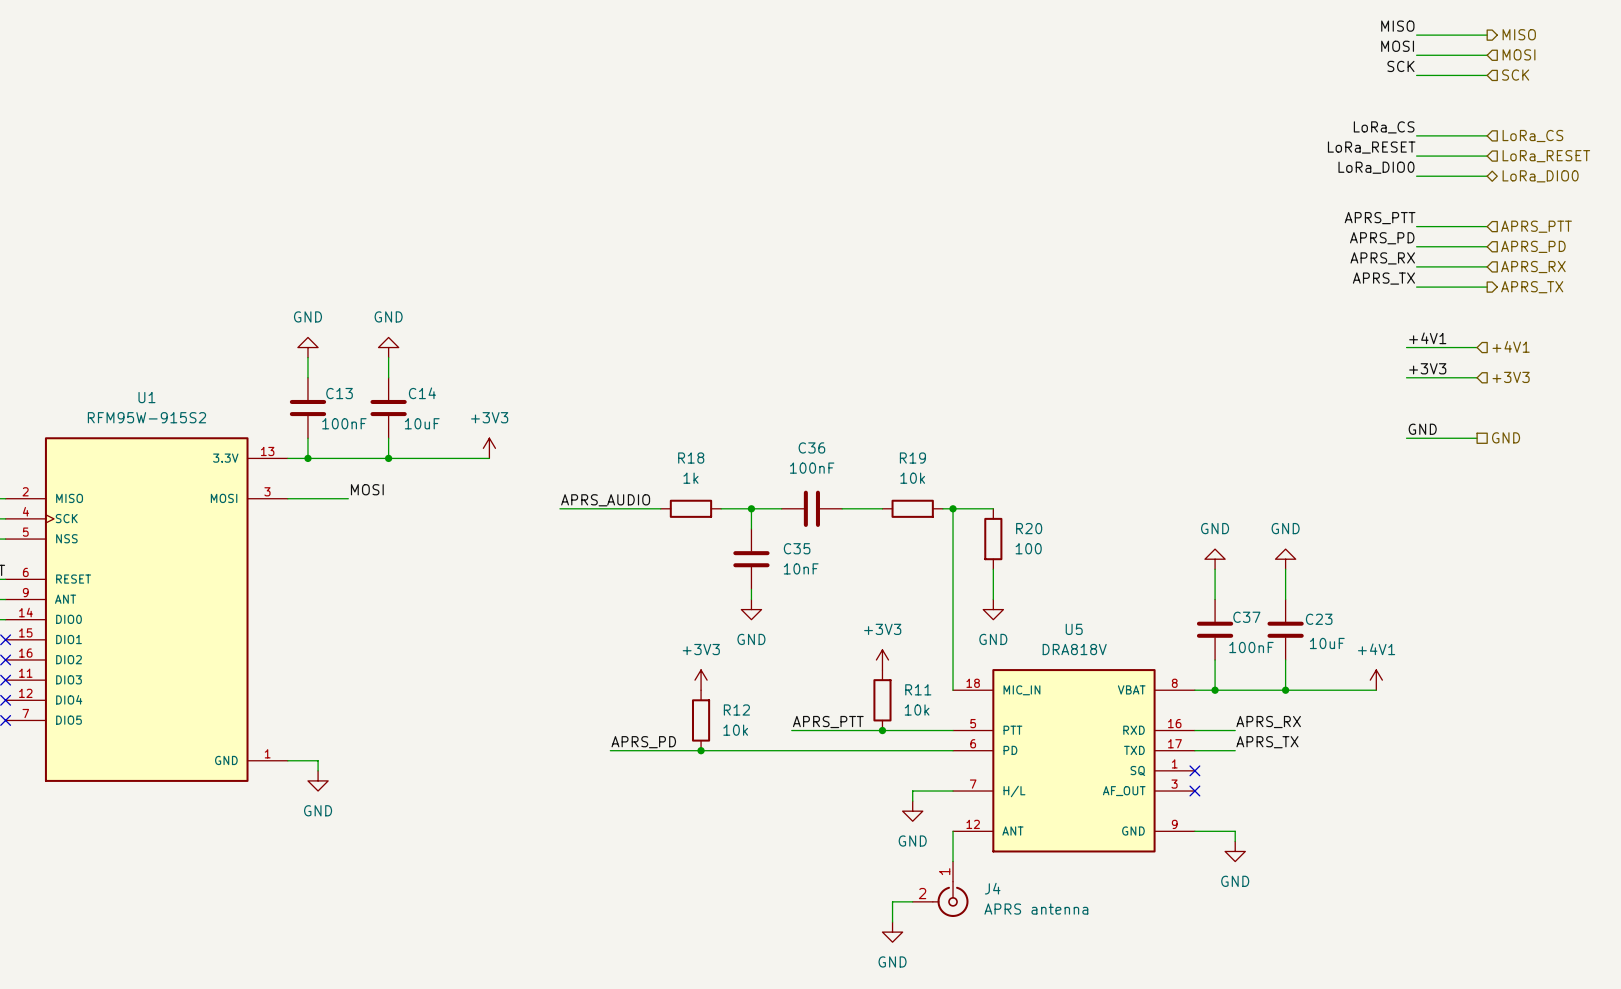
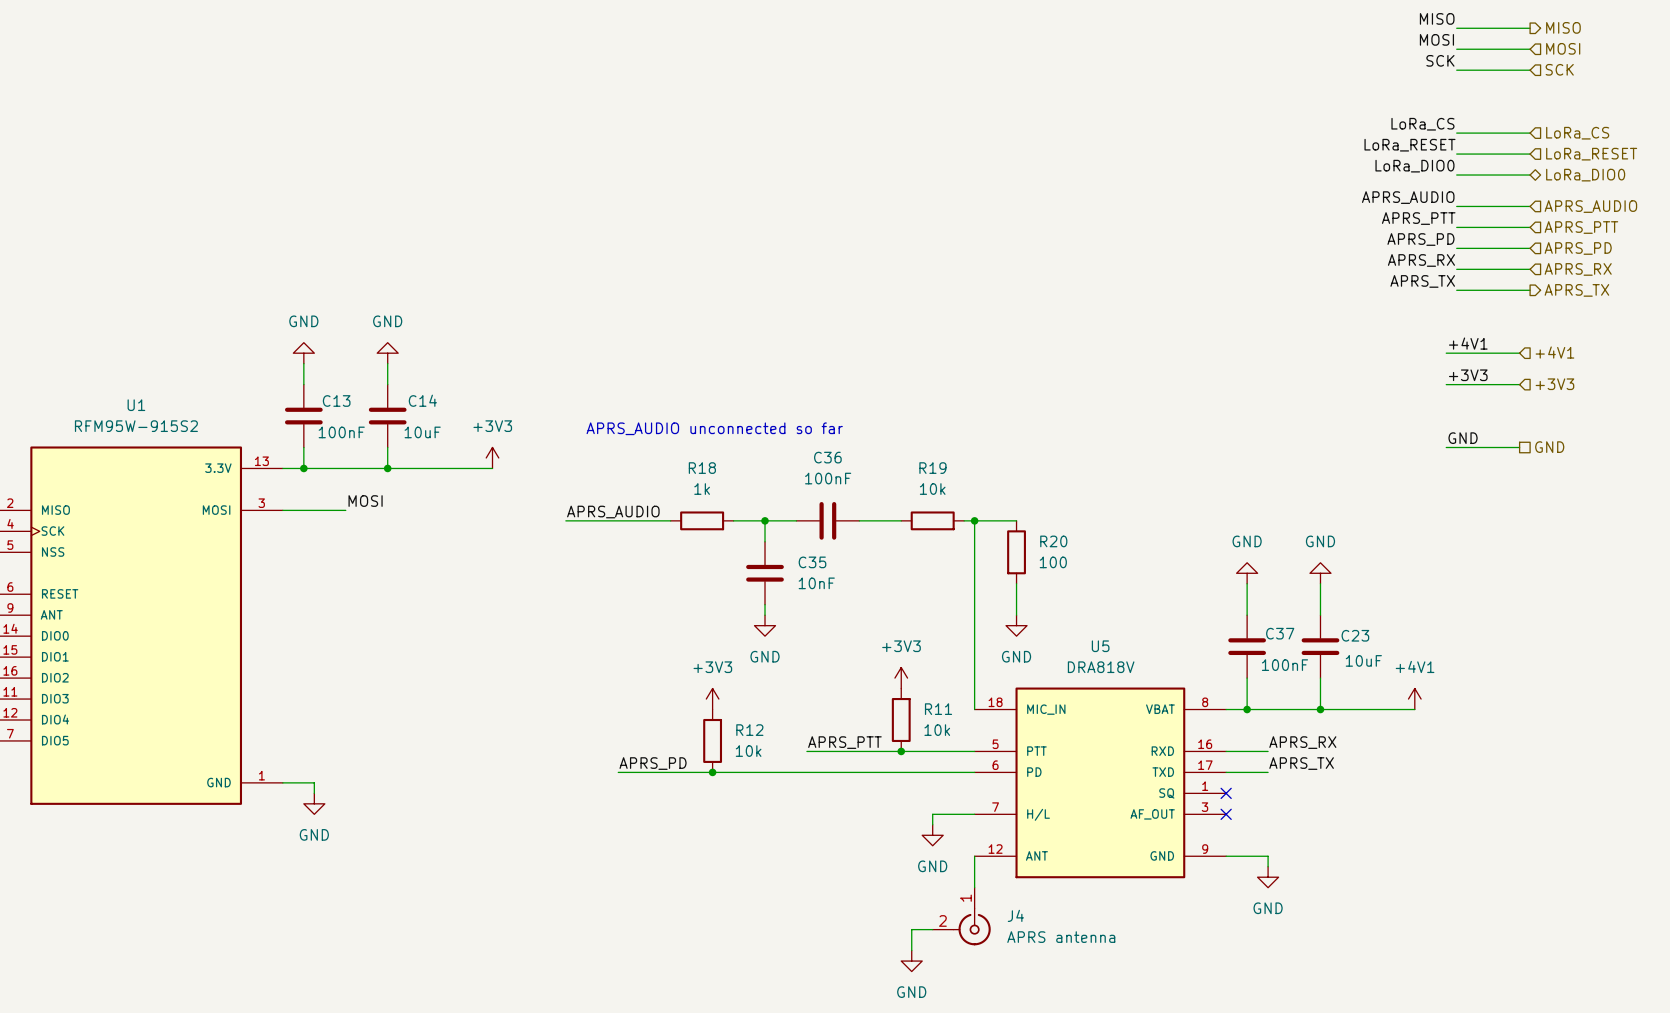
label: none -> APRS_AUDIO (1408, 197)
wire: none -> (1456, 206) (1530, 206)
hierarchical label: none -> APRS_AUDIO (1590, 206)
text: none -> APRS_AUDIO unconnected so far (714, 428)

